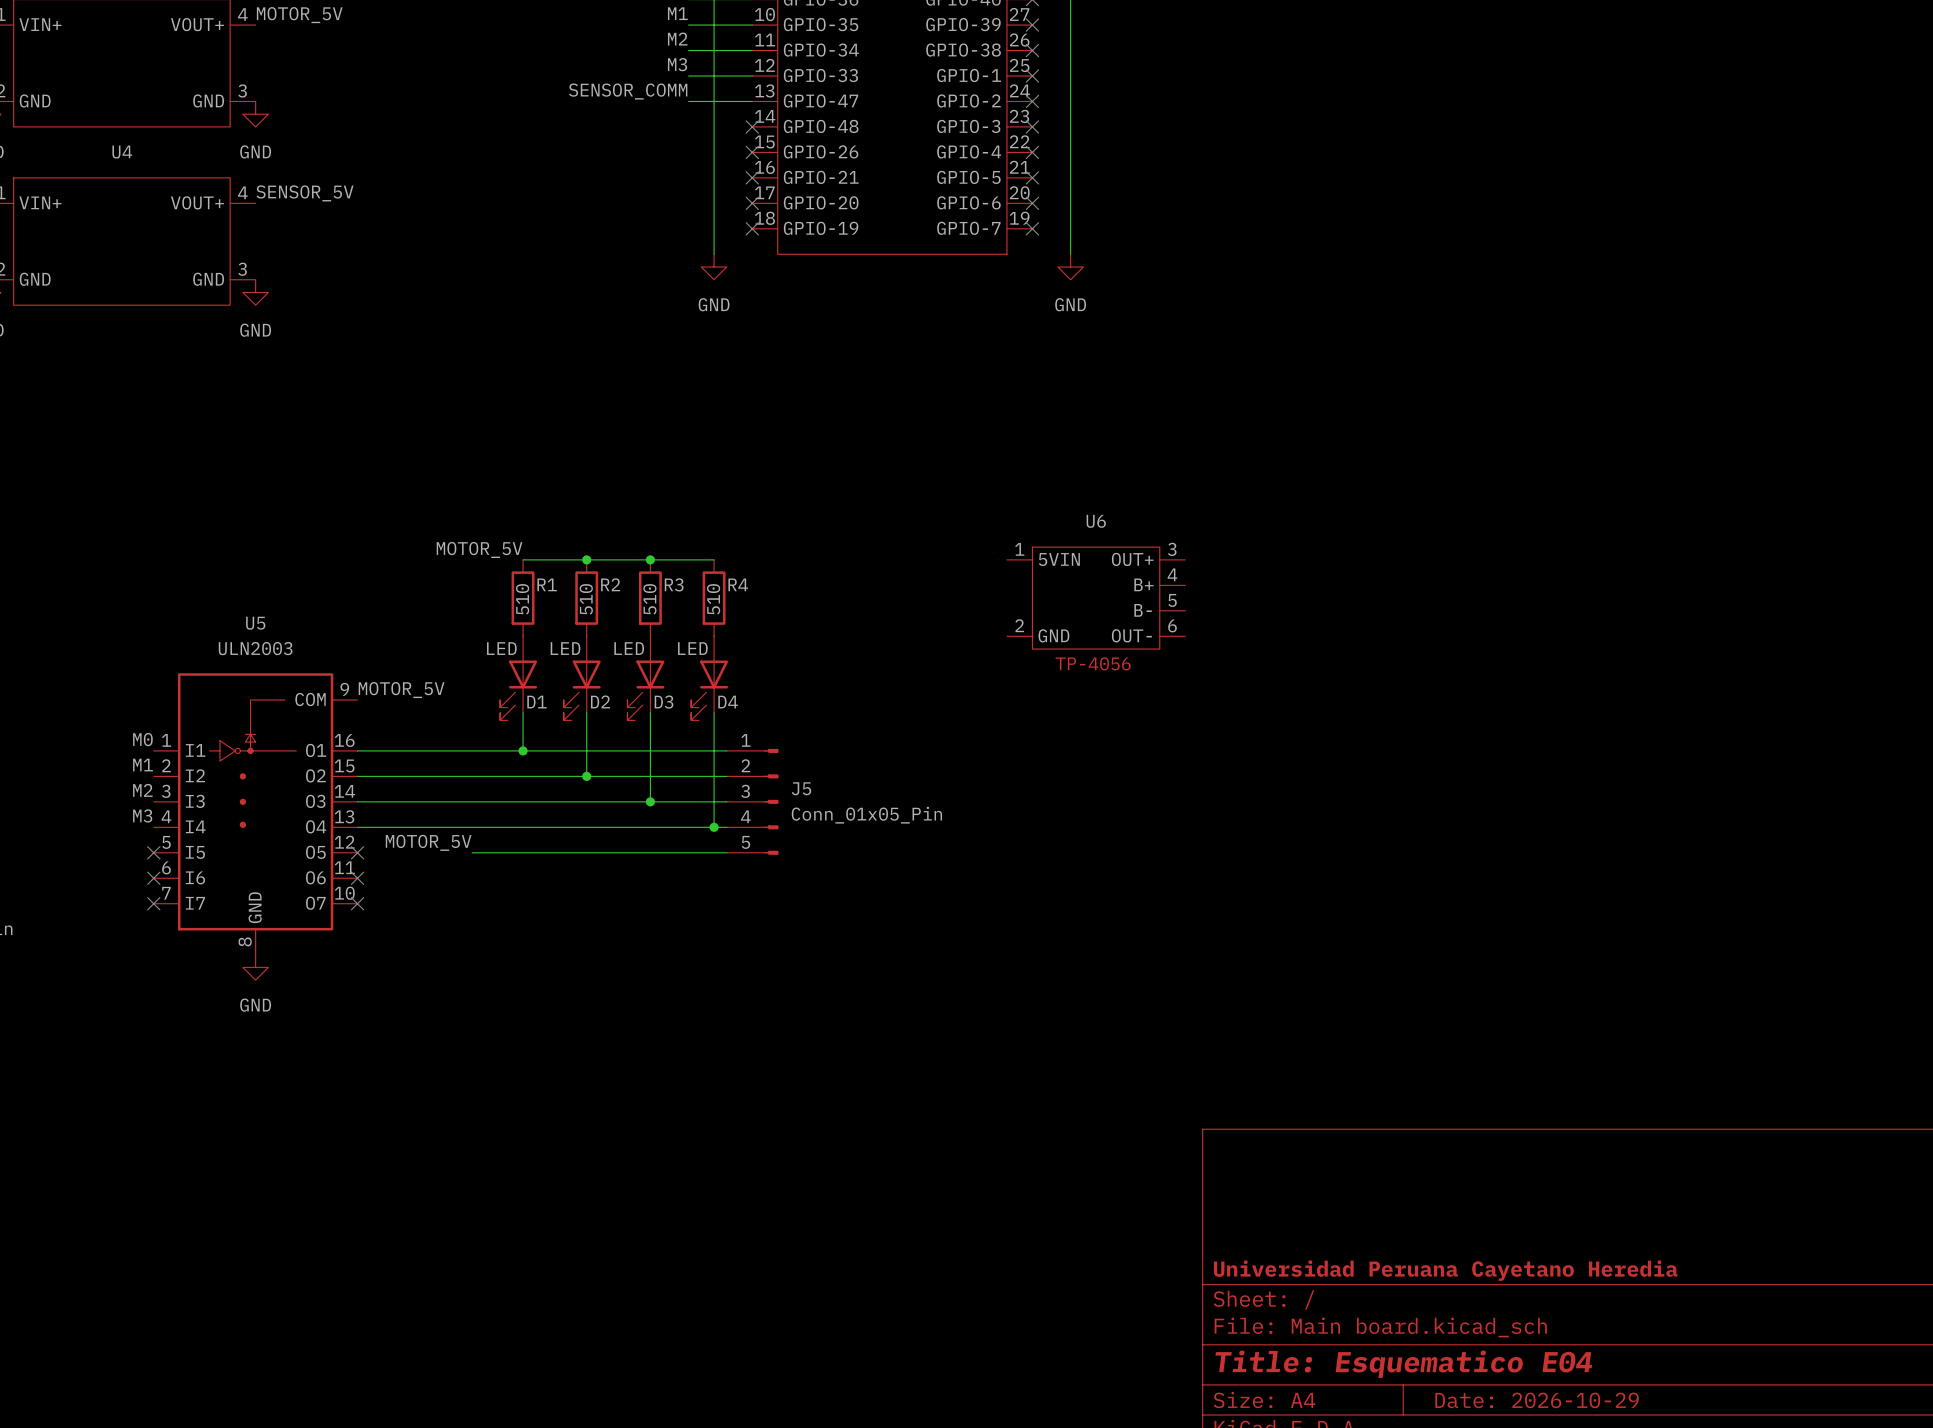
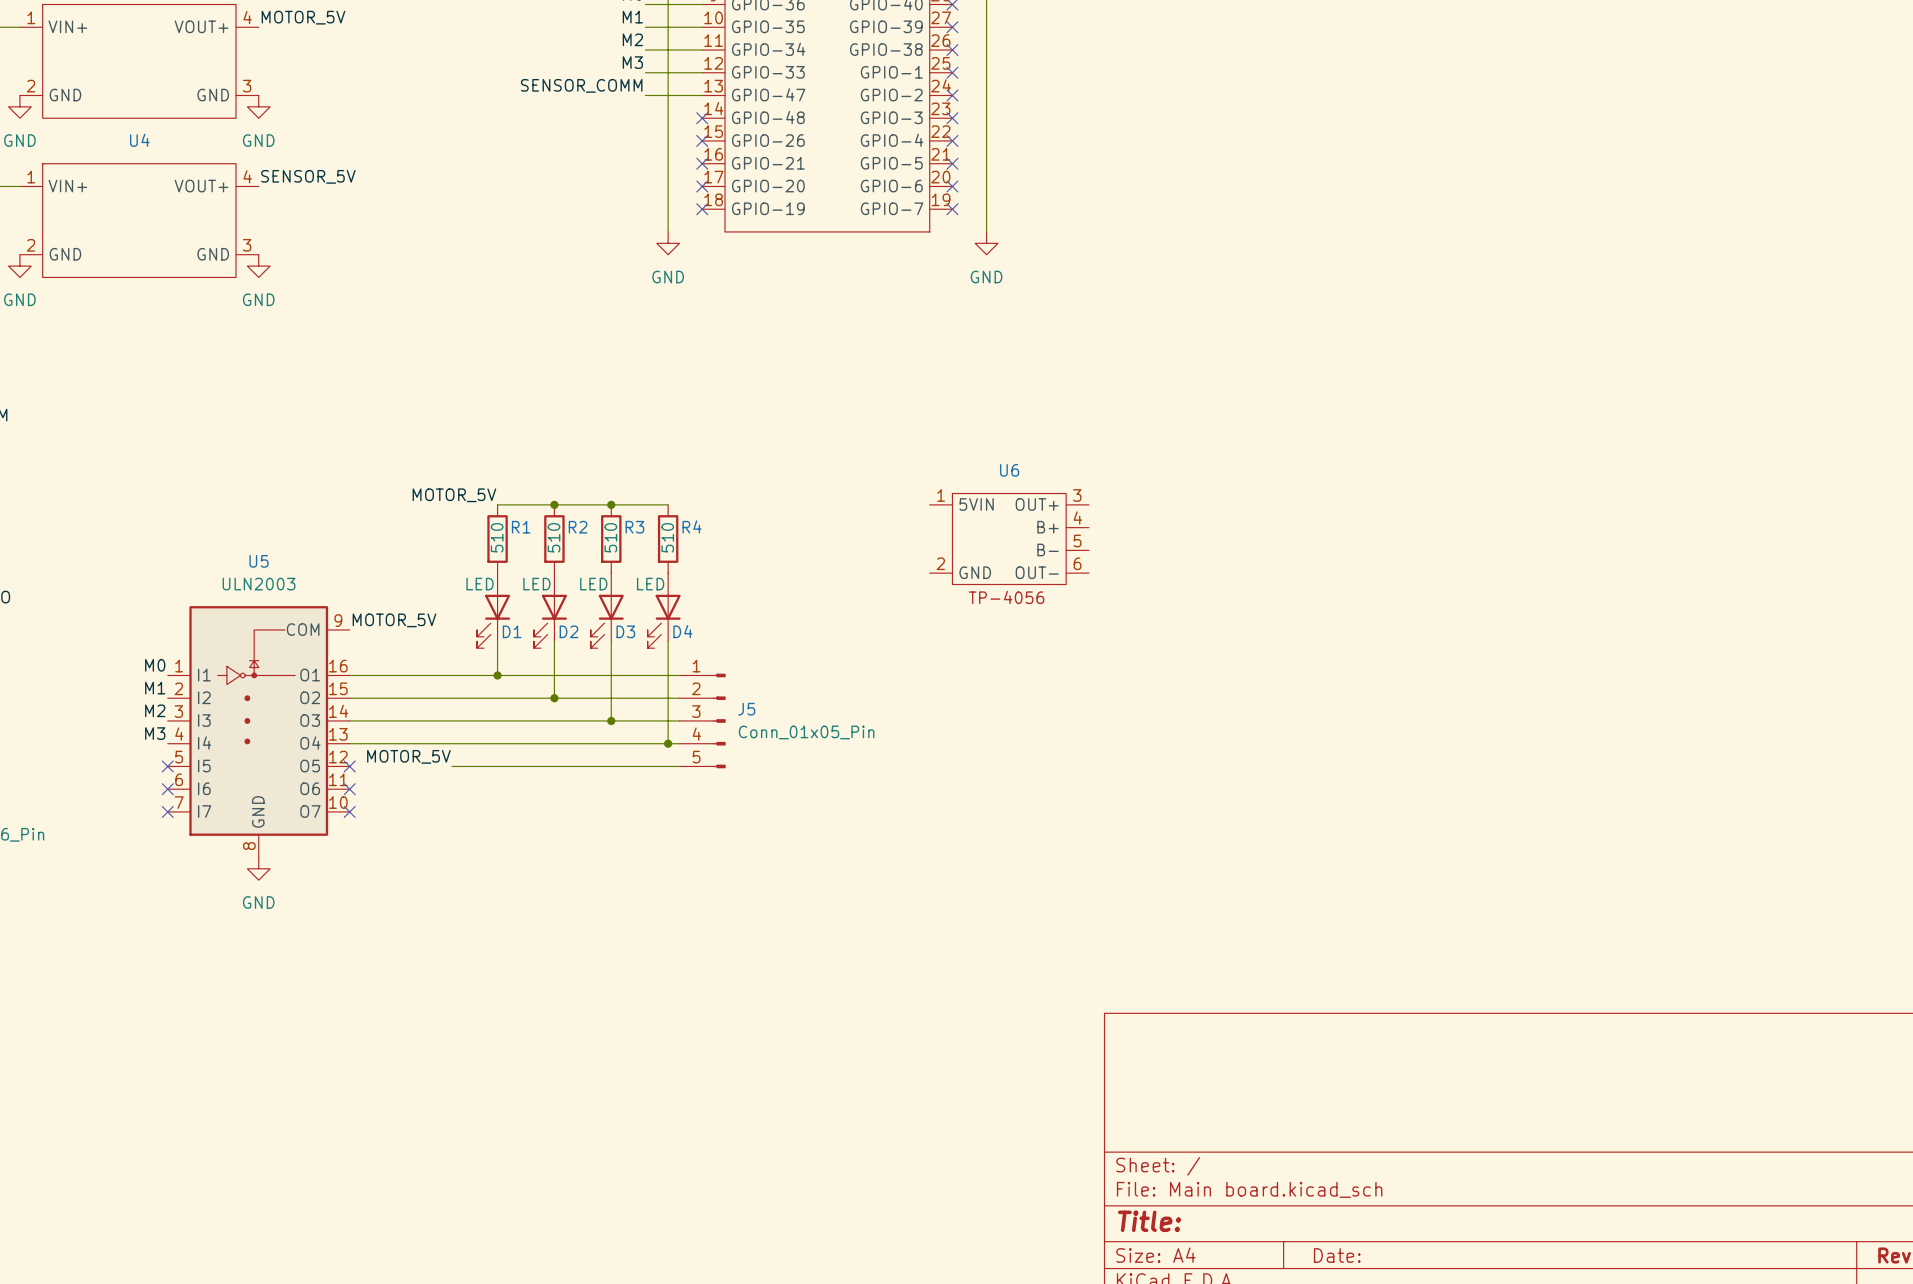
title block: Universidad Peruana Cayetano Heredia (1445, 1270) -> none
title block: Title: Esquematico E04 (1403, 1364) -> Title: (1149, 1221)
title block: Date: 2026-10-29 (1537, 1400) -> Date: (1337, 1255)

